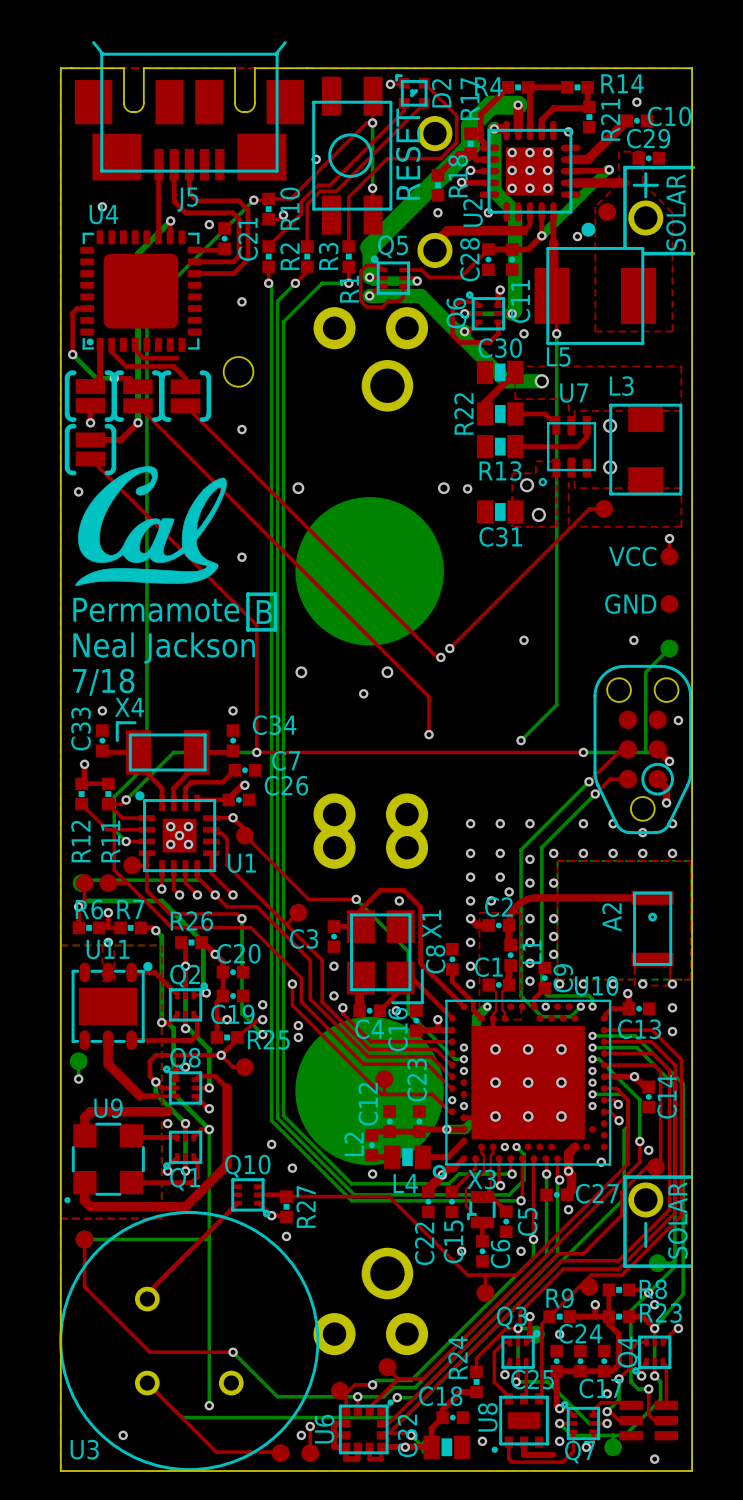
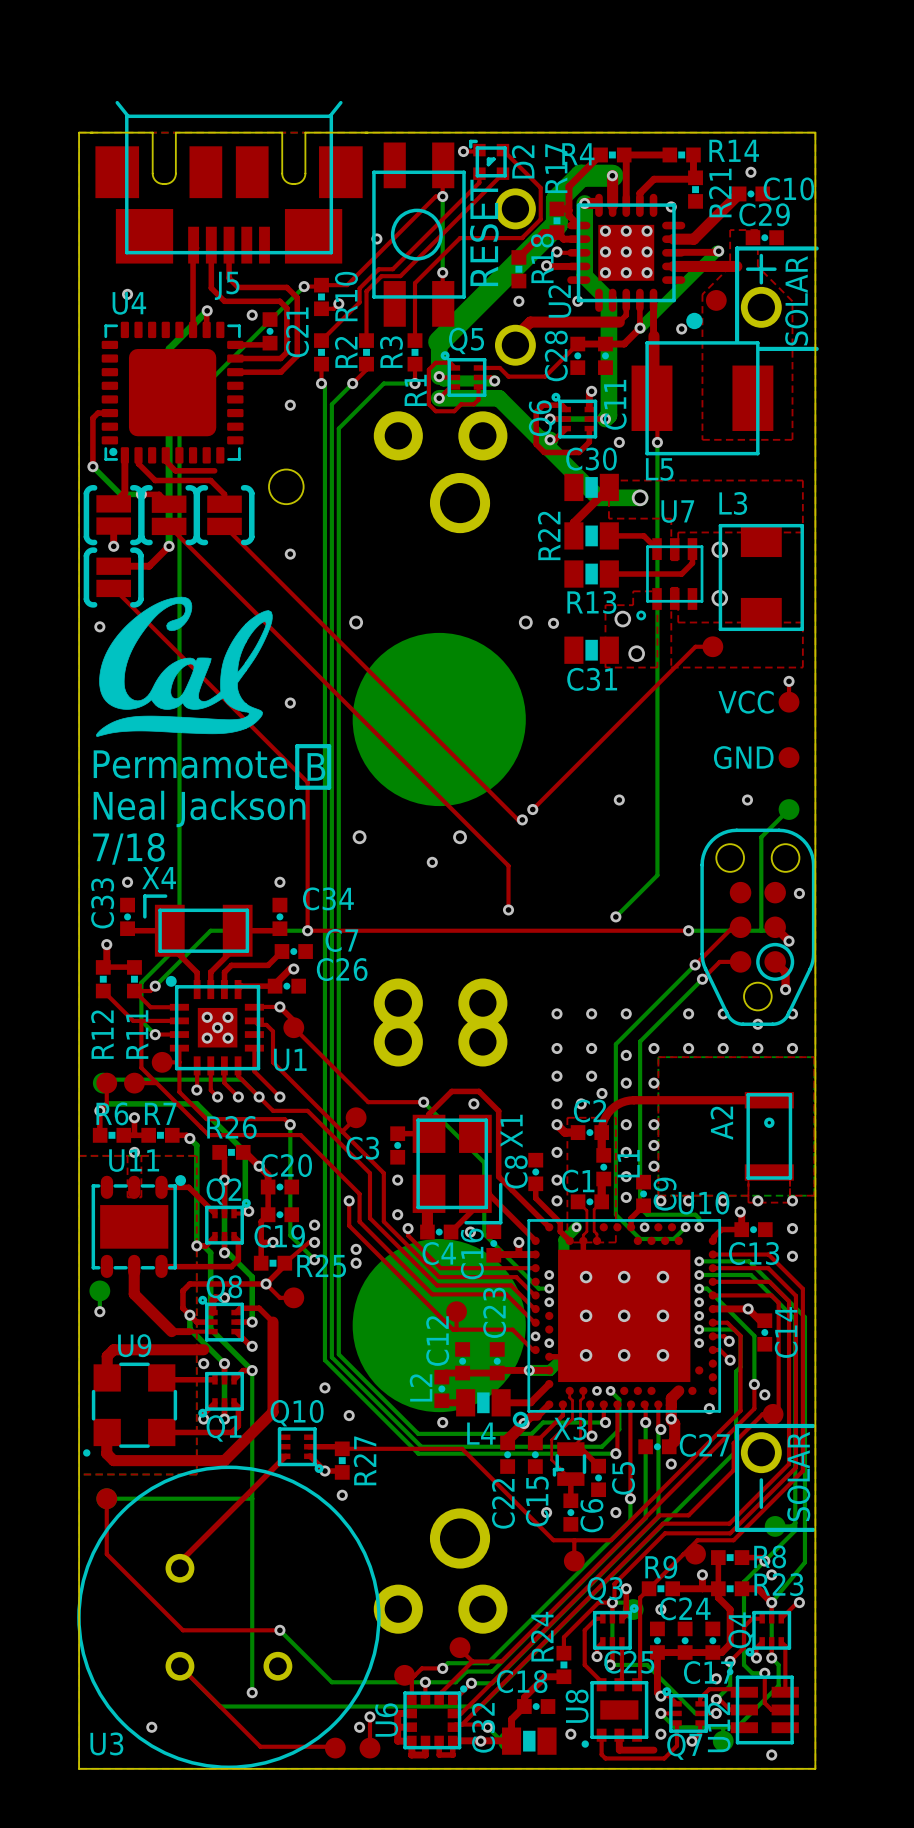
U12: none -> (762, 1706)
part: (648, 1420) -> none

